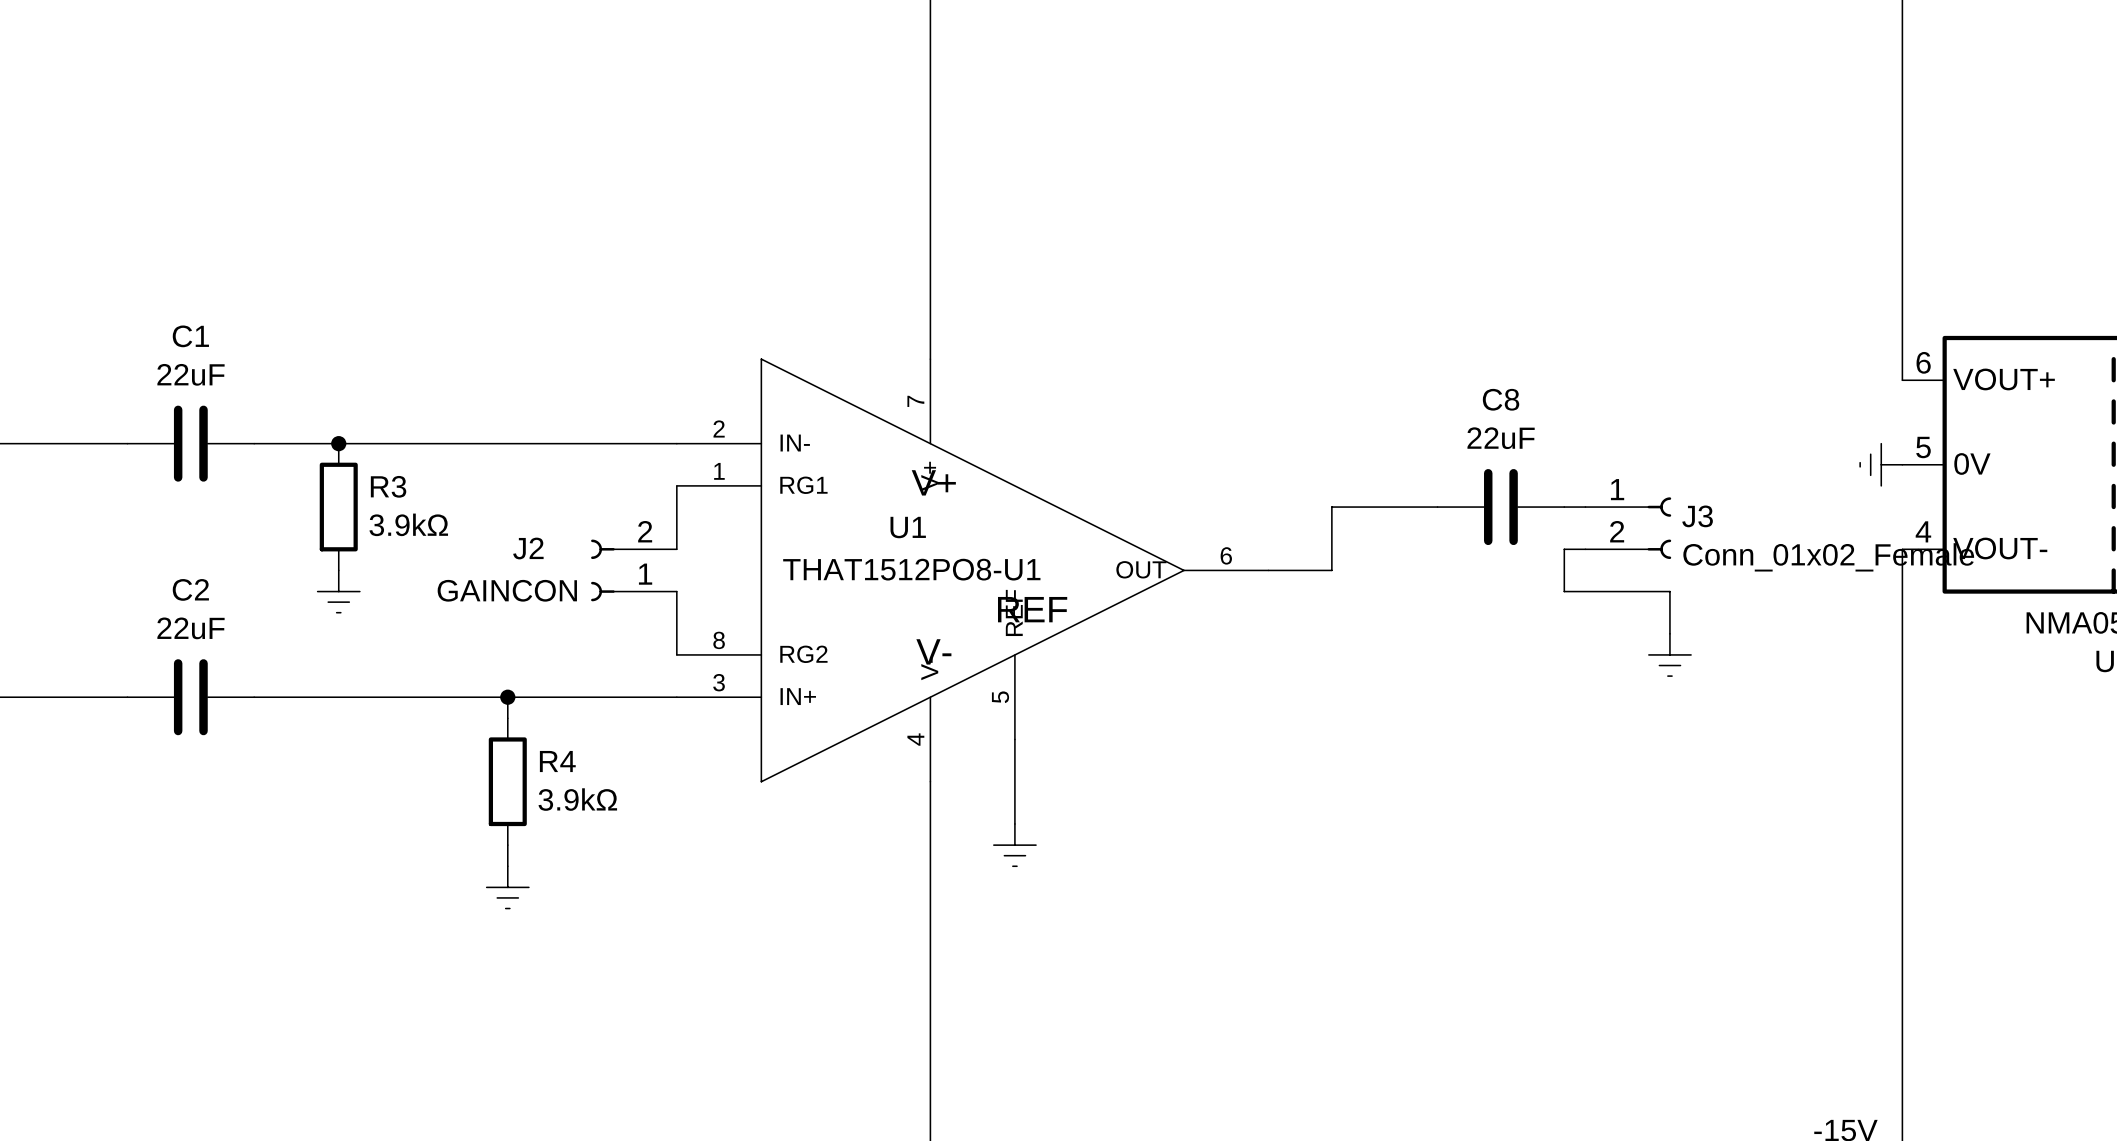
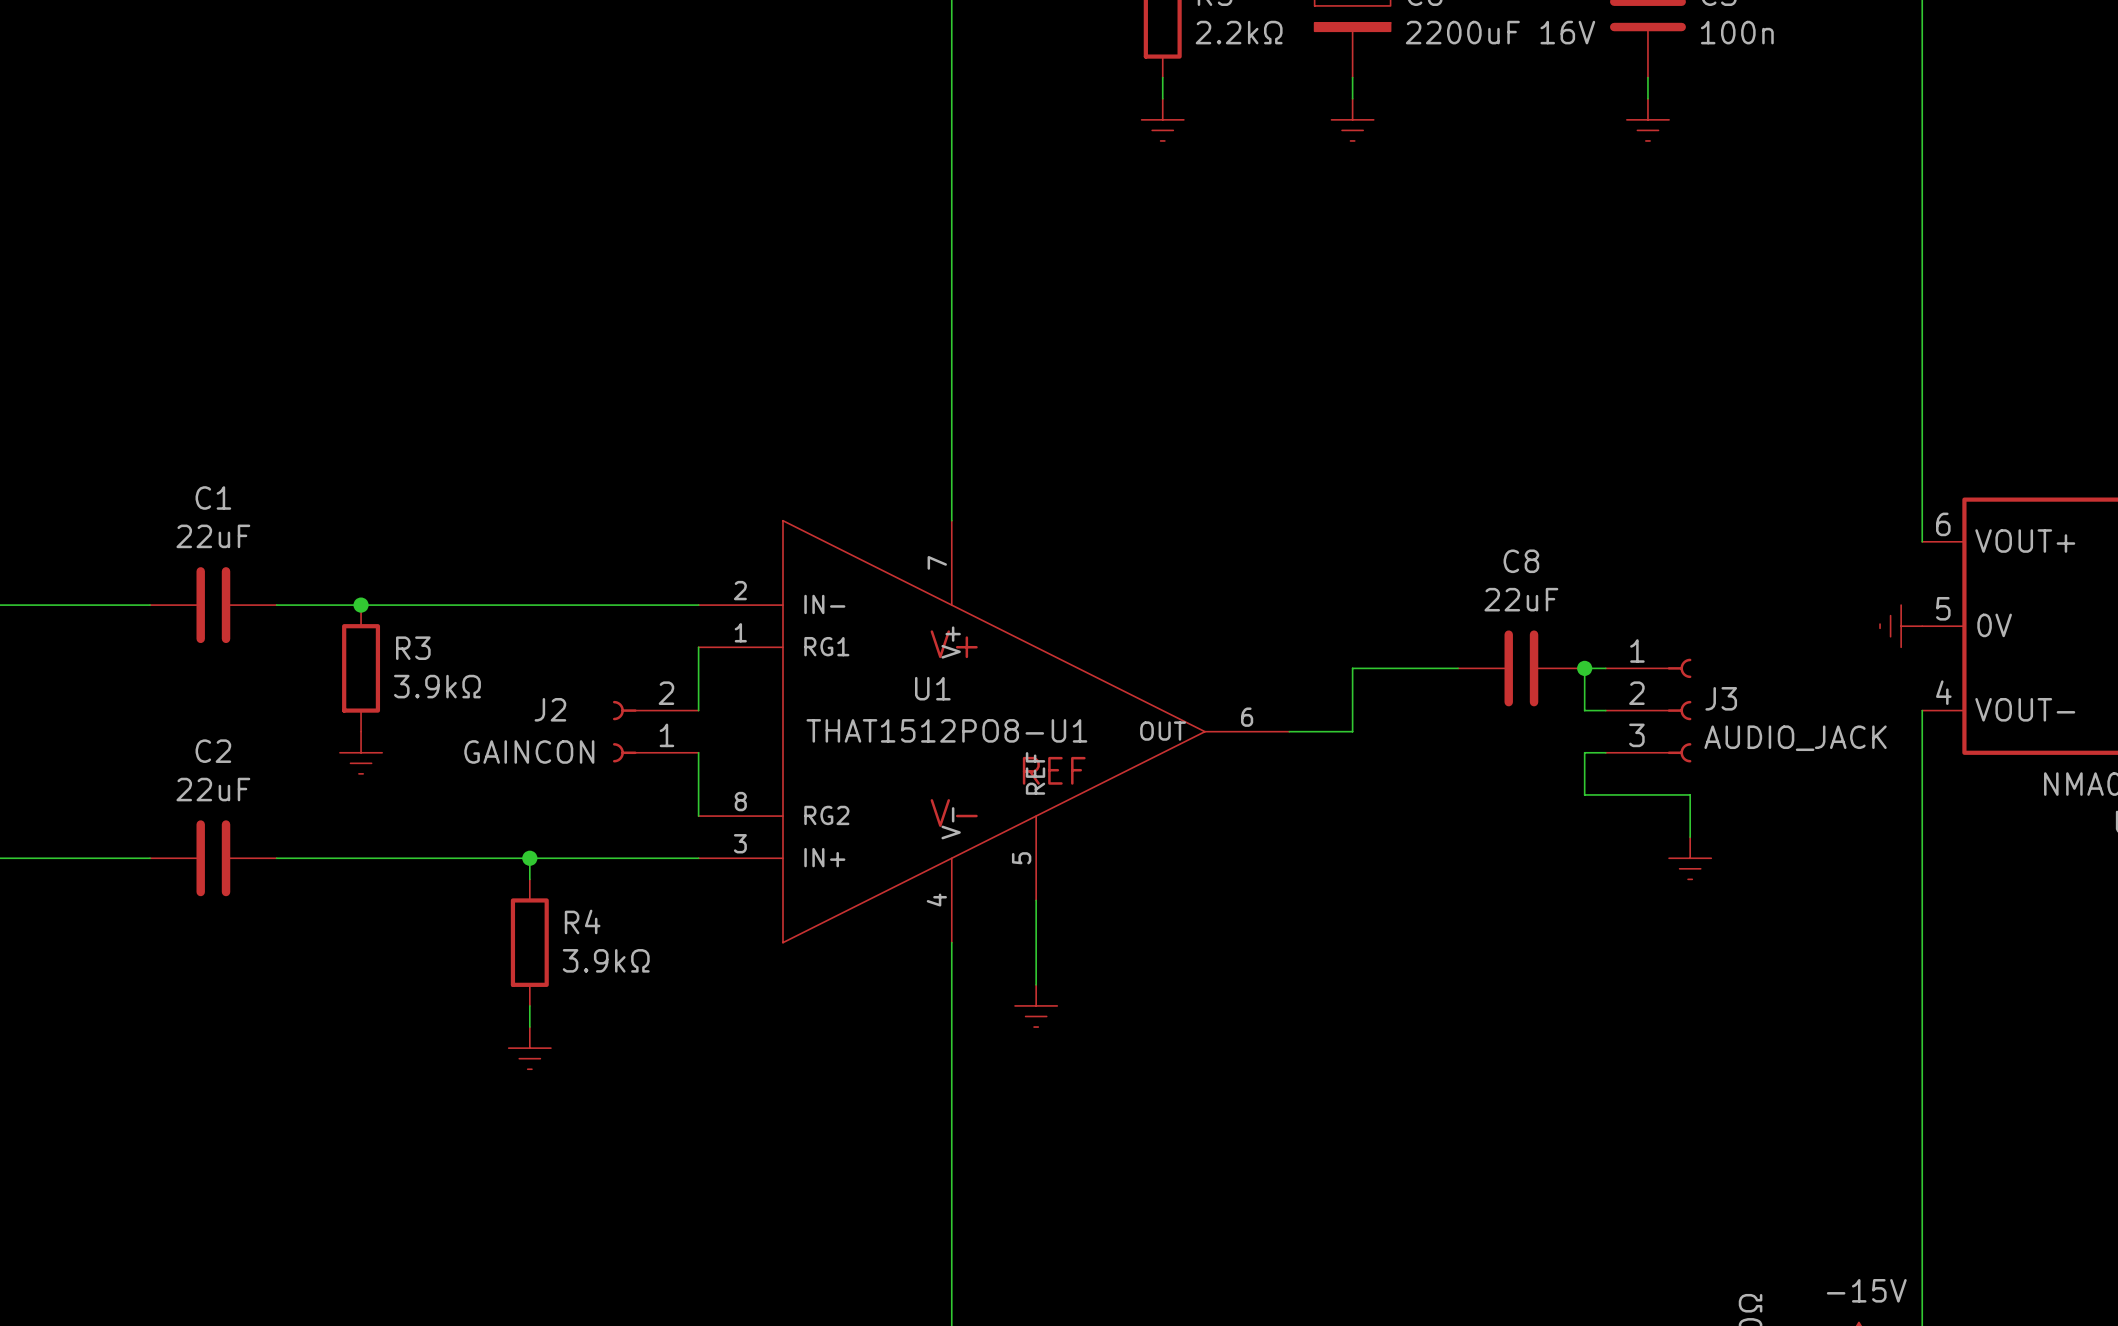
J3 symbol: [1585, 497, 1672, 560] -> [1605, 658, 1692, 763]
junction: none -> (1584, 668)
wire: (1564, 549) (1564, 591) -> (1584, 710) (1584, 668)
J3 value: Conn_01x02_Female (1828, 557) -> AUDIO_JACK (1795, 738)
wire: none -> (1584, 752) (1584, 794) (1690, 794) (1690, 837)
wire: (1585, 591) (1669, 591) (1669, 633) -> none
power symbol position: (1669, 654) -> (1690, 858)

